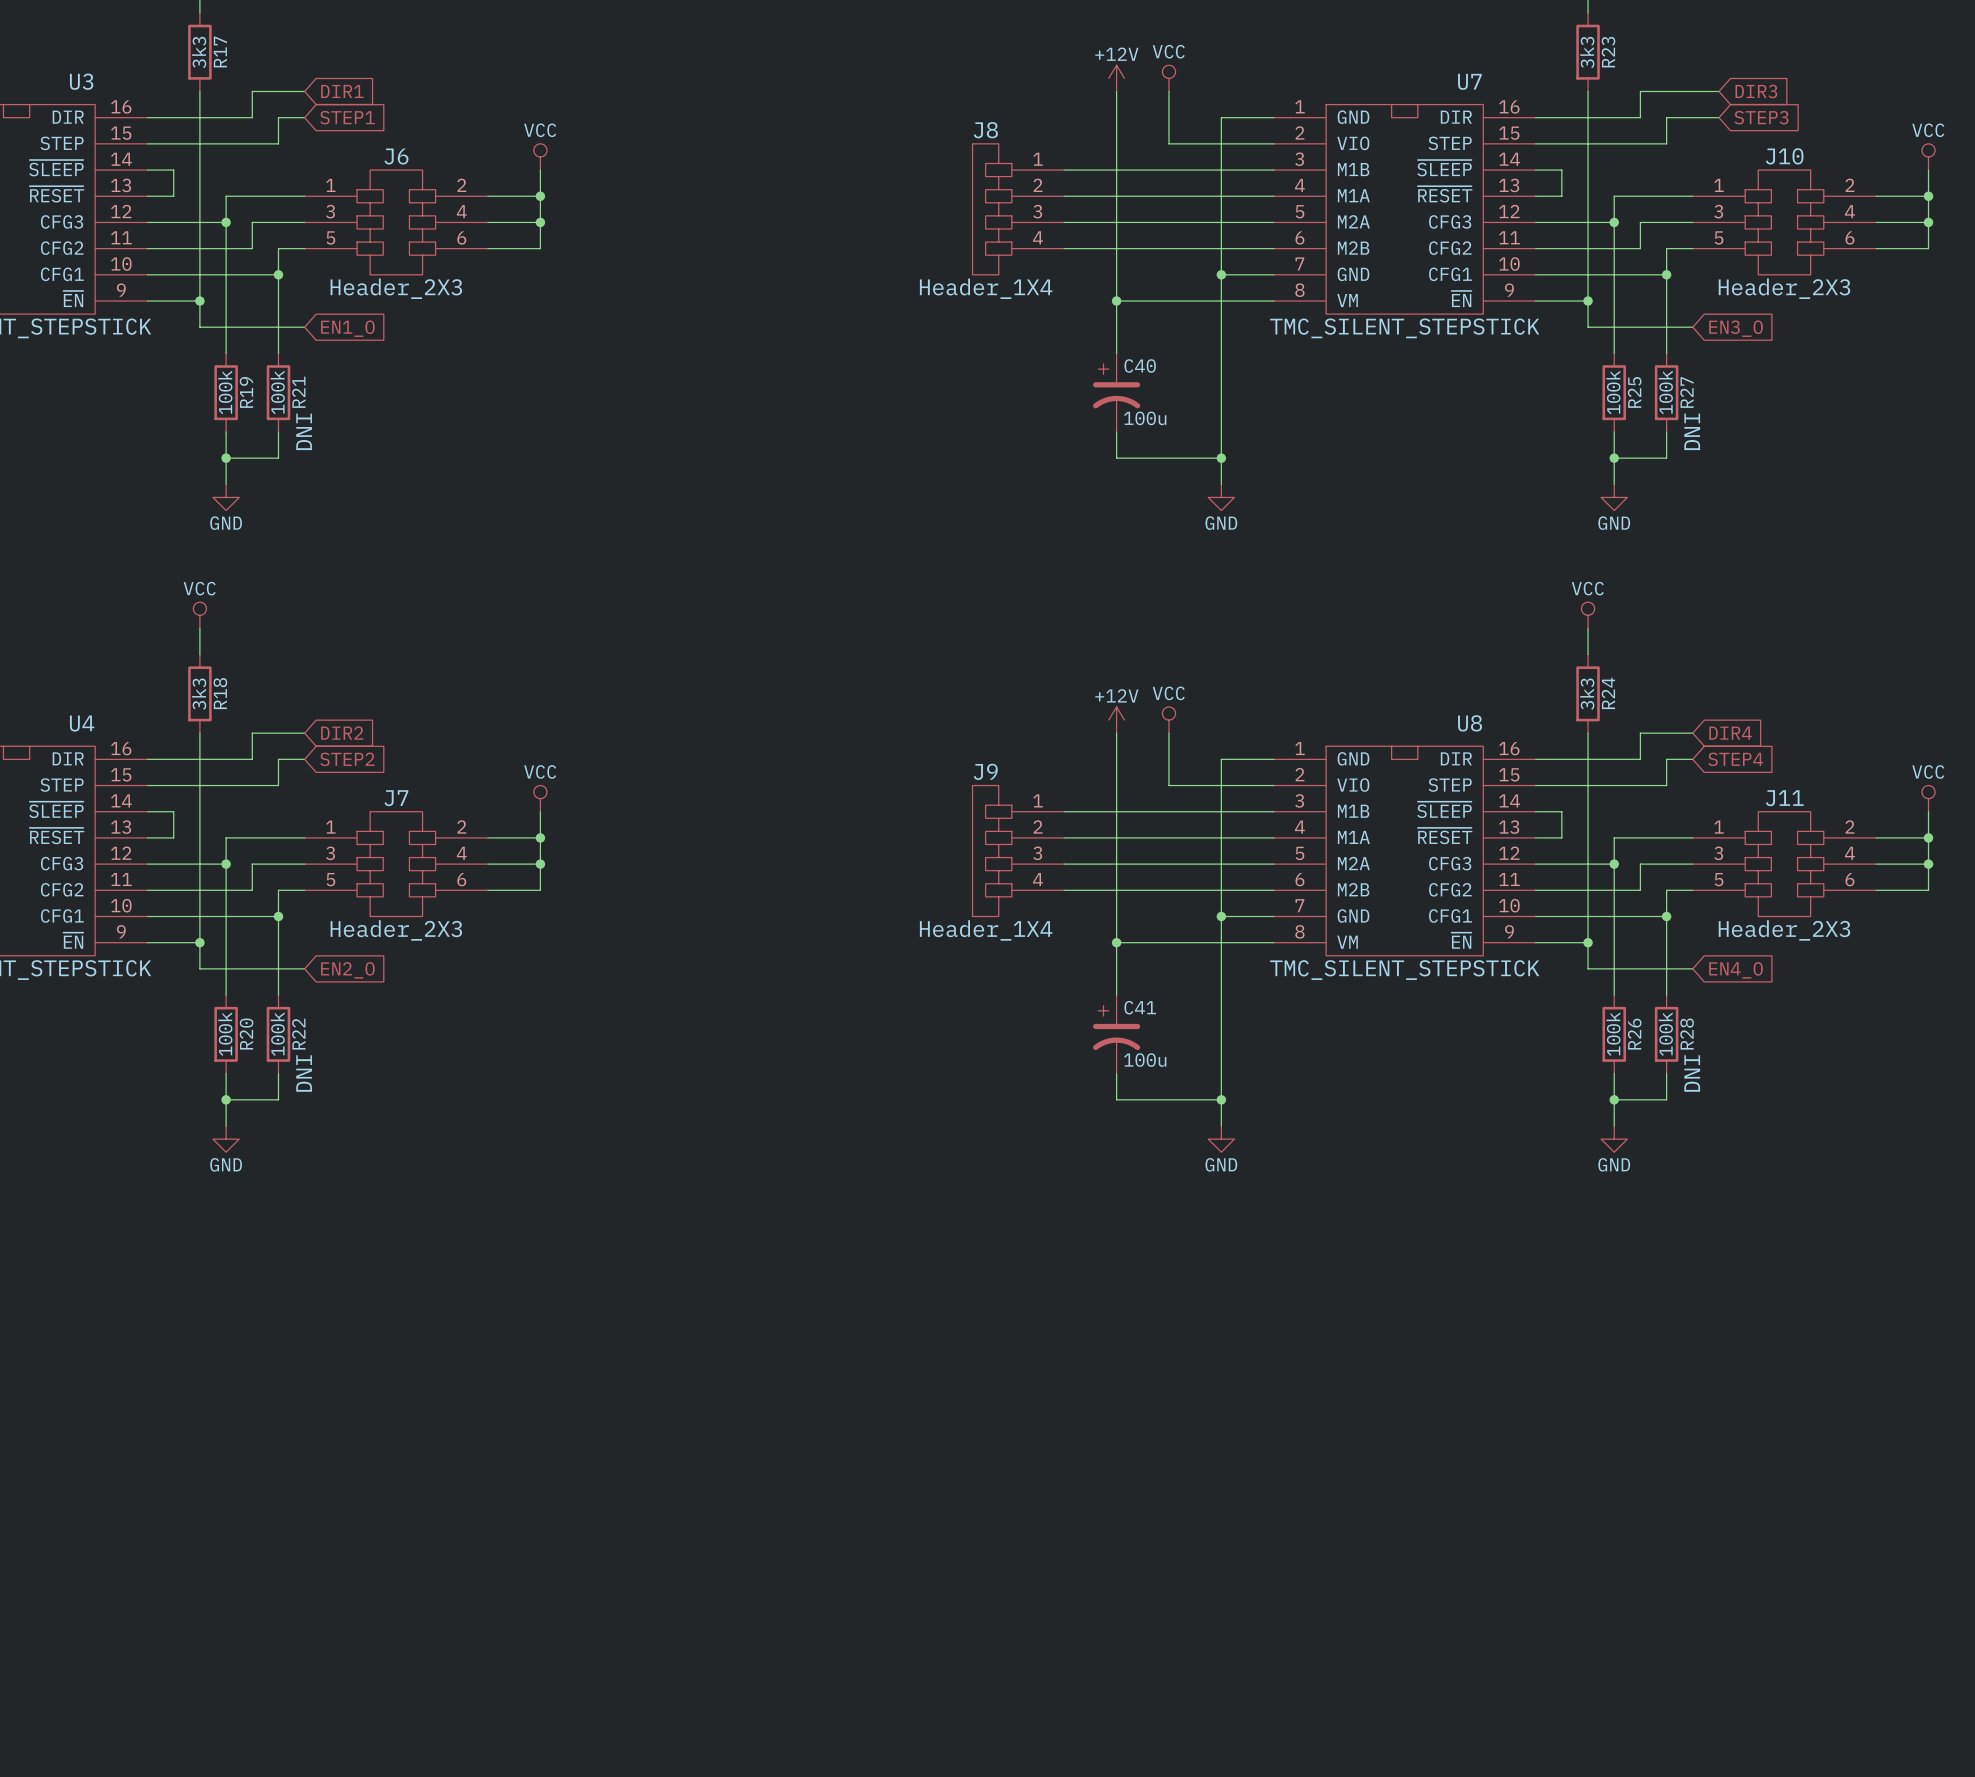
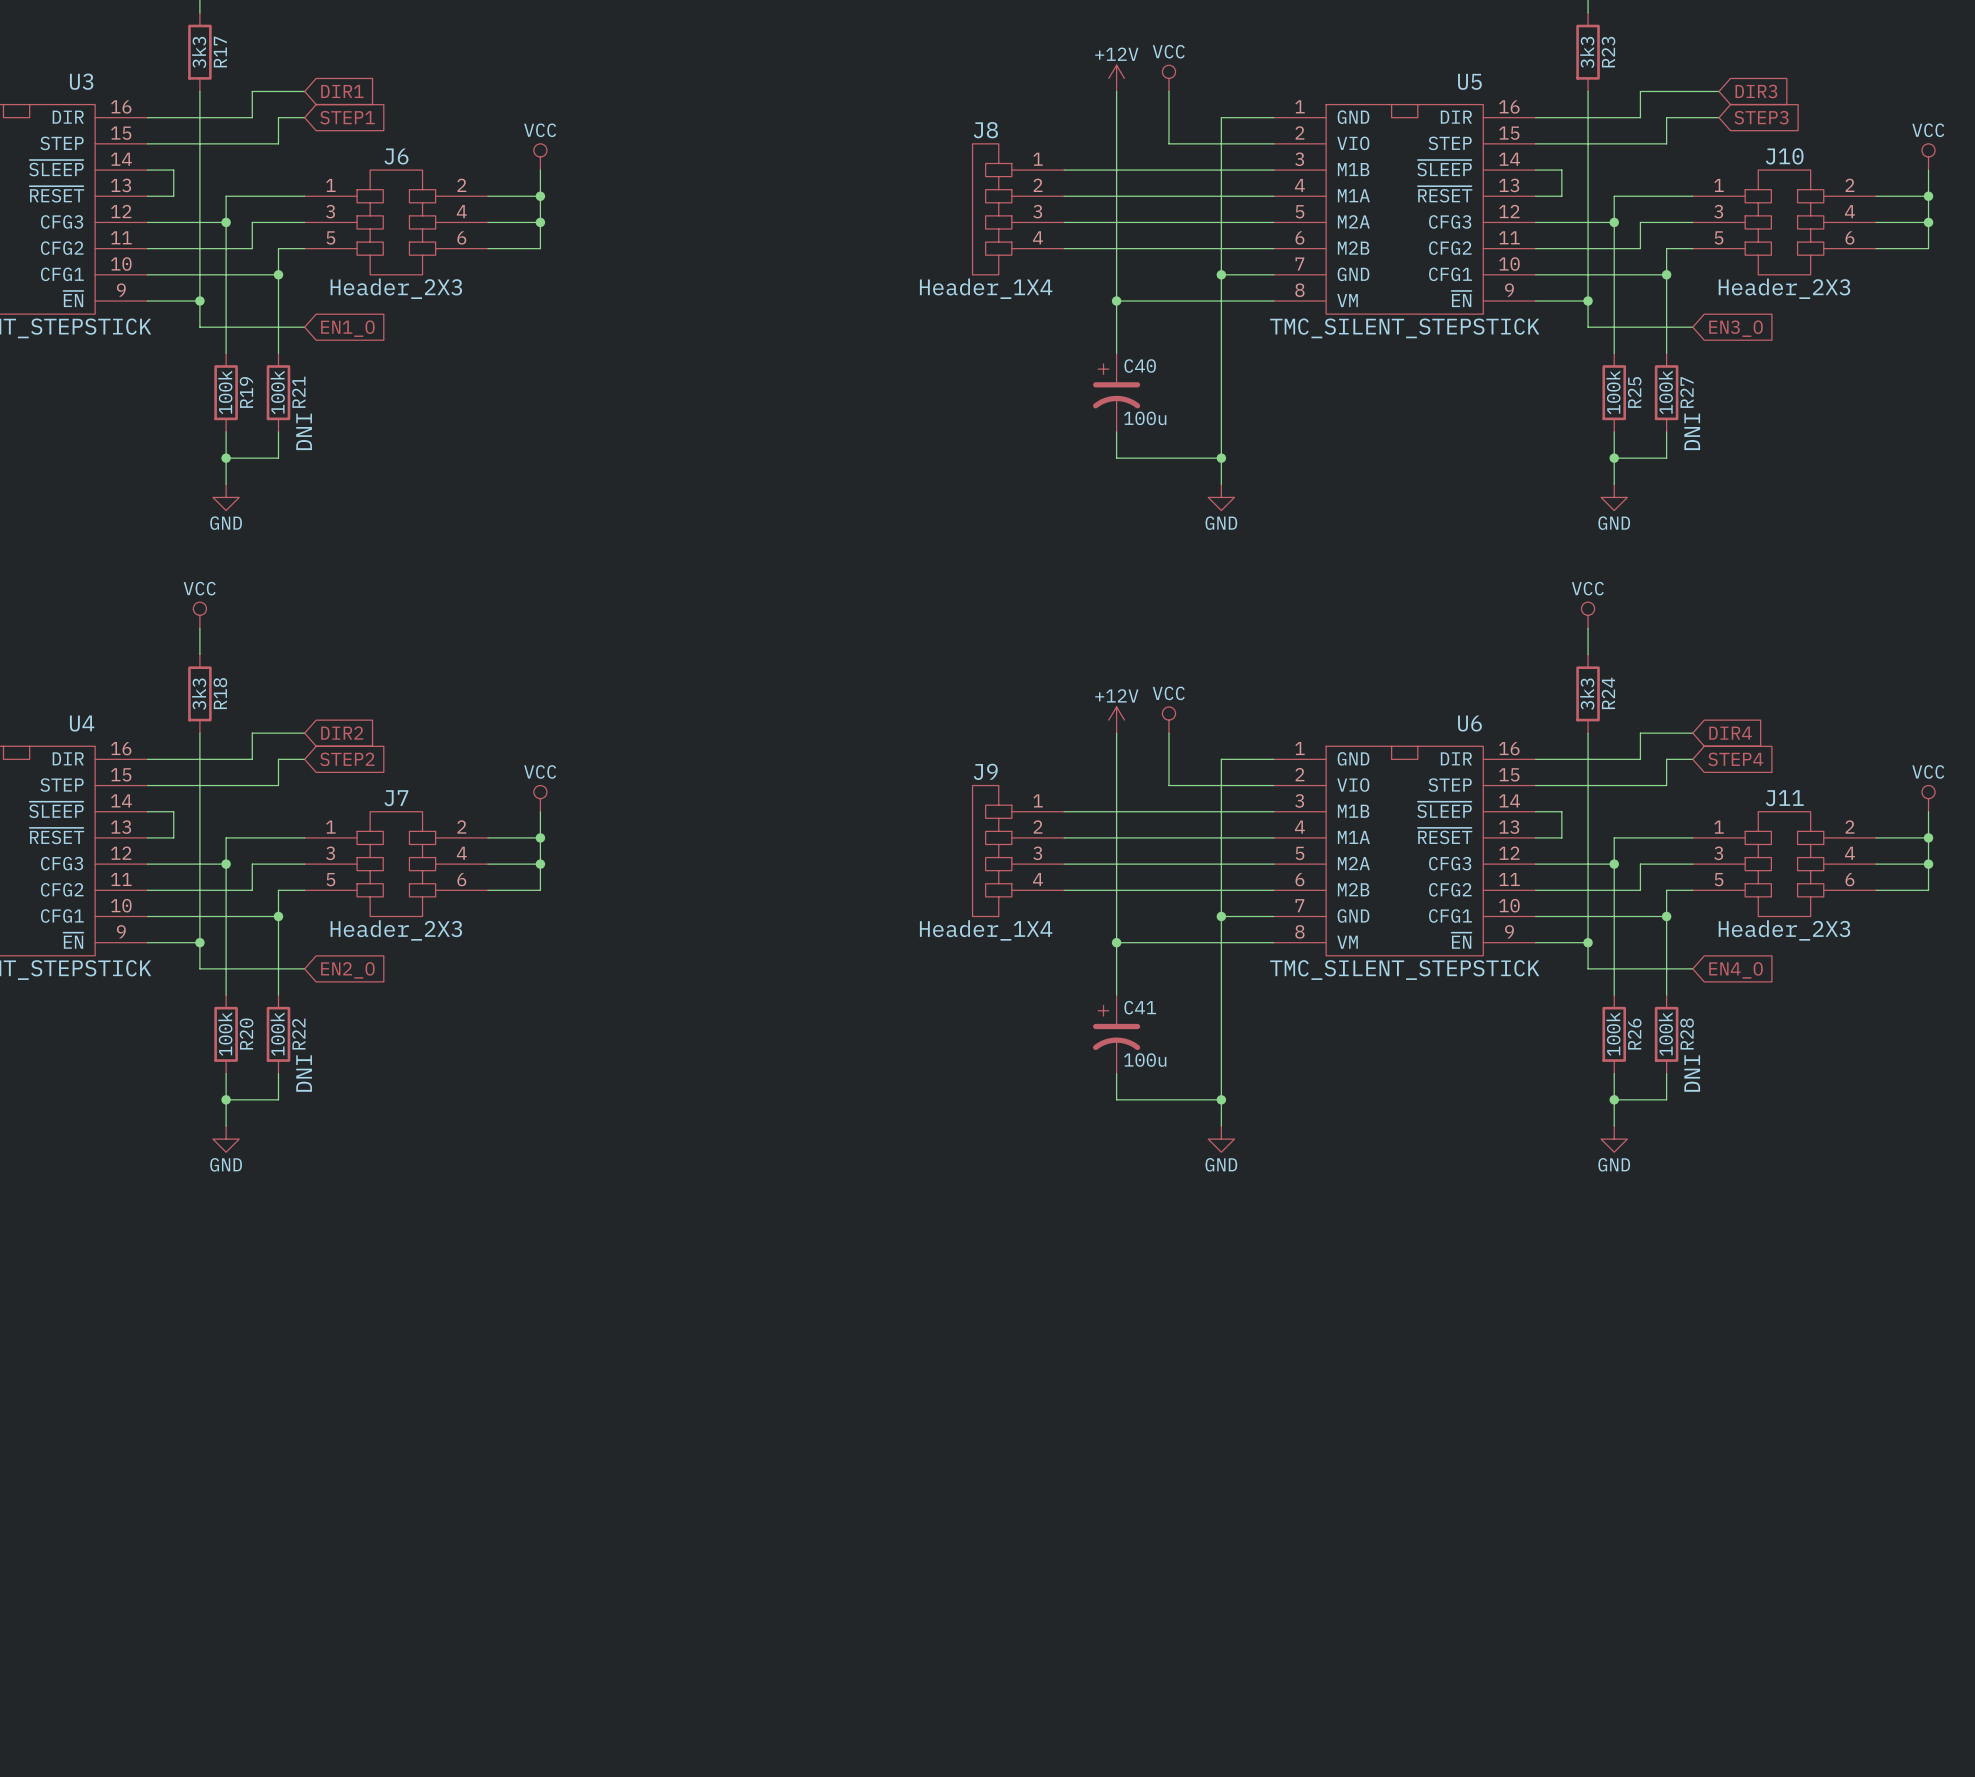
U7 name: U7 (1469, 81) -> U5 (1469, 81)
U8 name: U8 (1470, 723) -> U6 (1469, 723)

